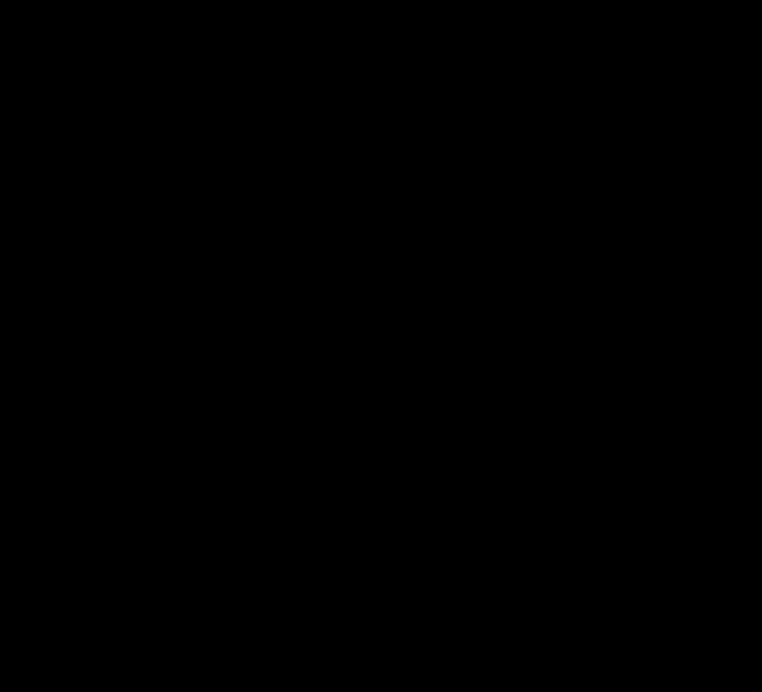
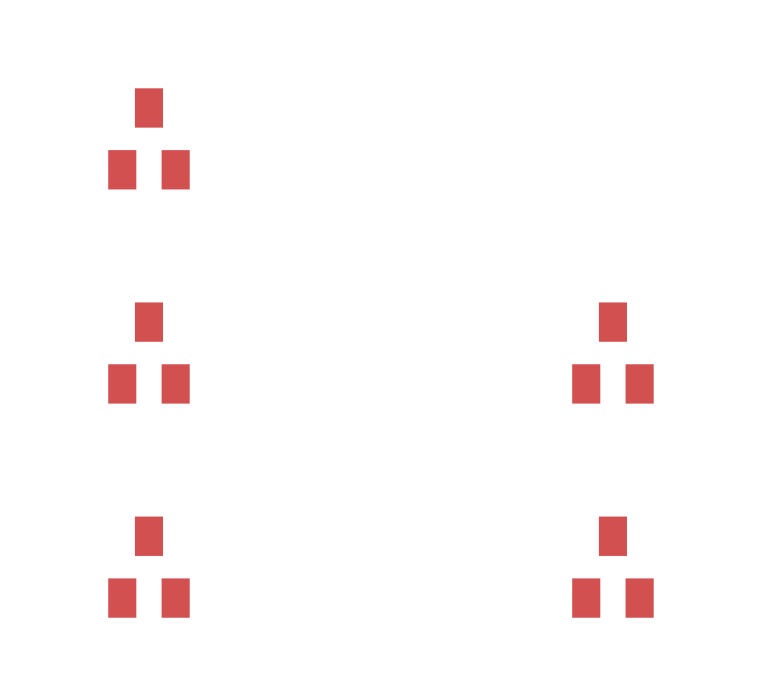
part: none -> (148, 138)
part: none -> (148, 353)
part: none -> (612, 353)
part: none -> (148, 567)
part: none -> (612, 567)

